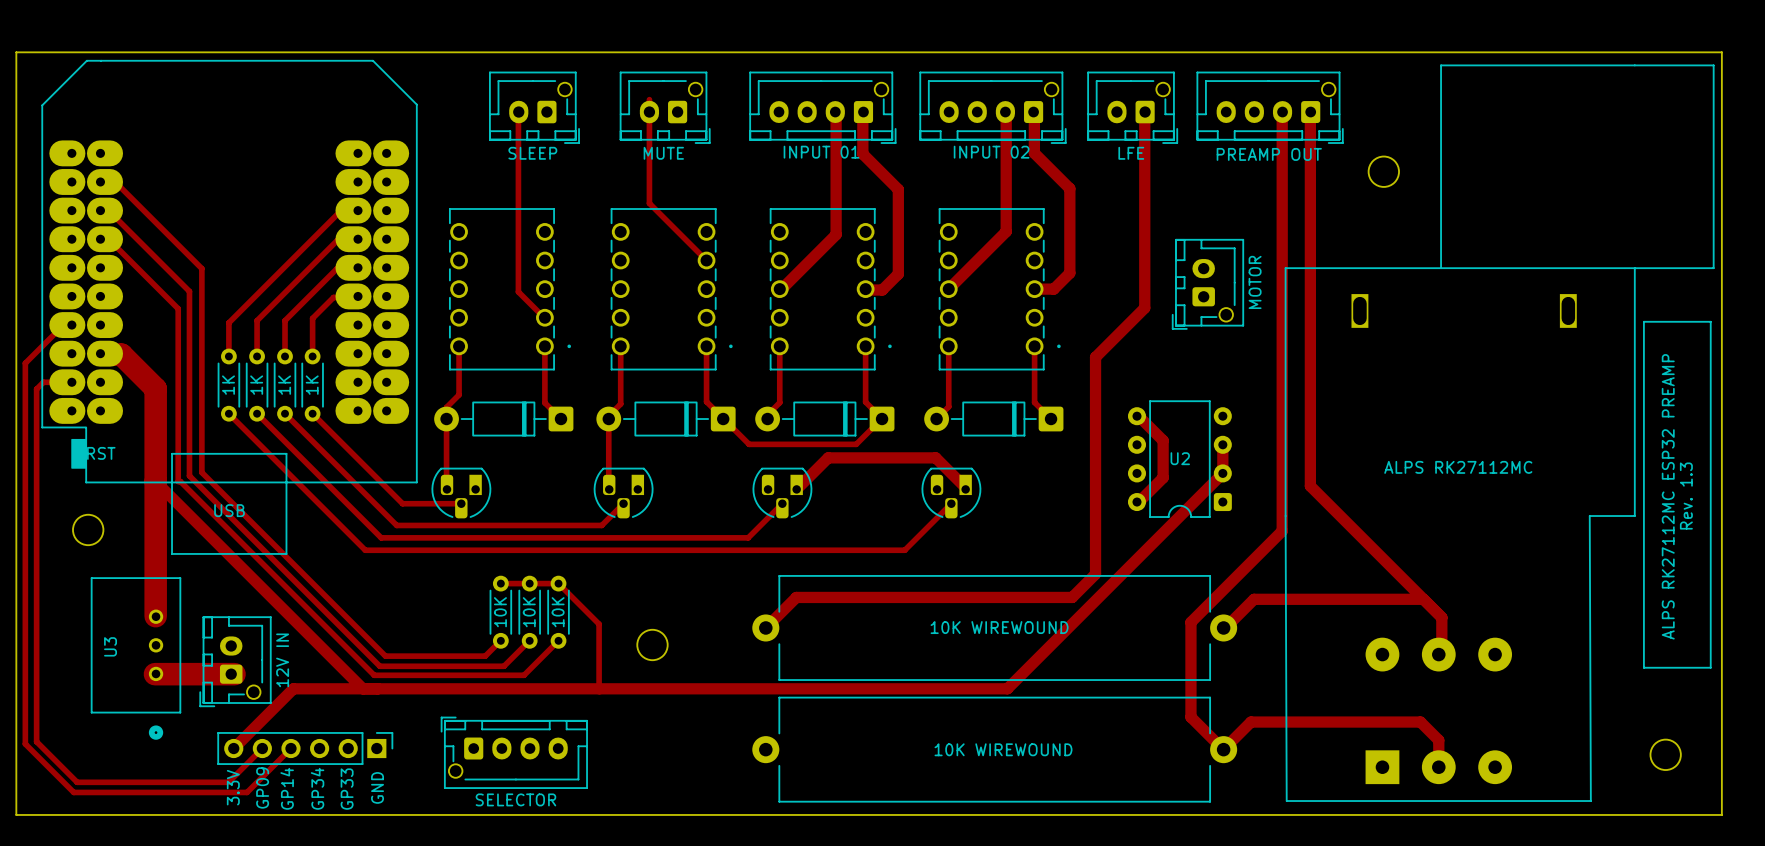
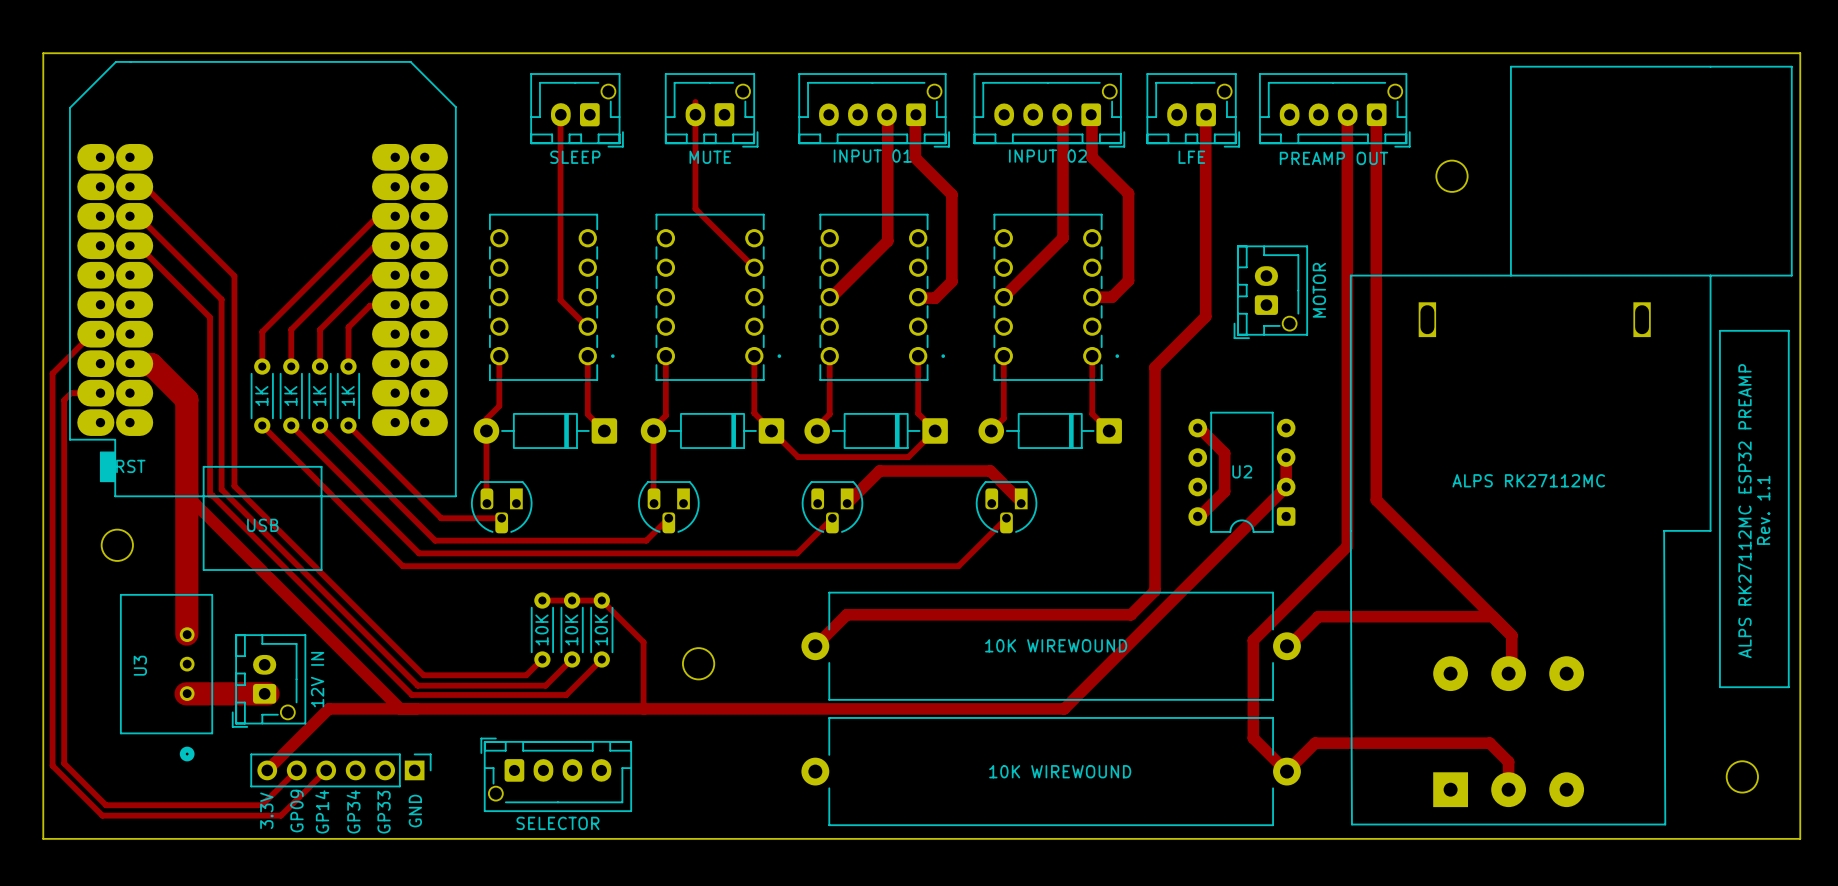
text: Rev. 1.3 (1686, 496) -> Rev. 1.1 (1763, 510)

